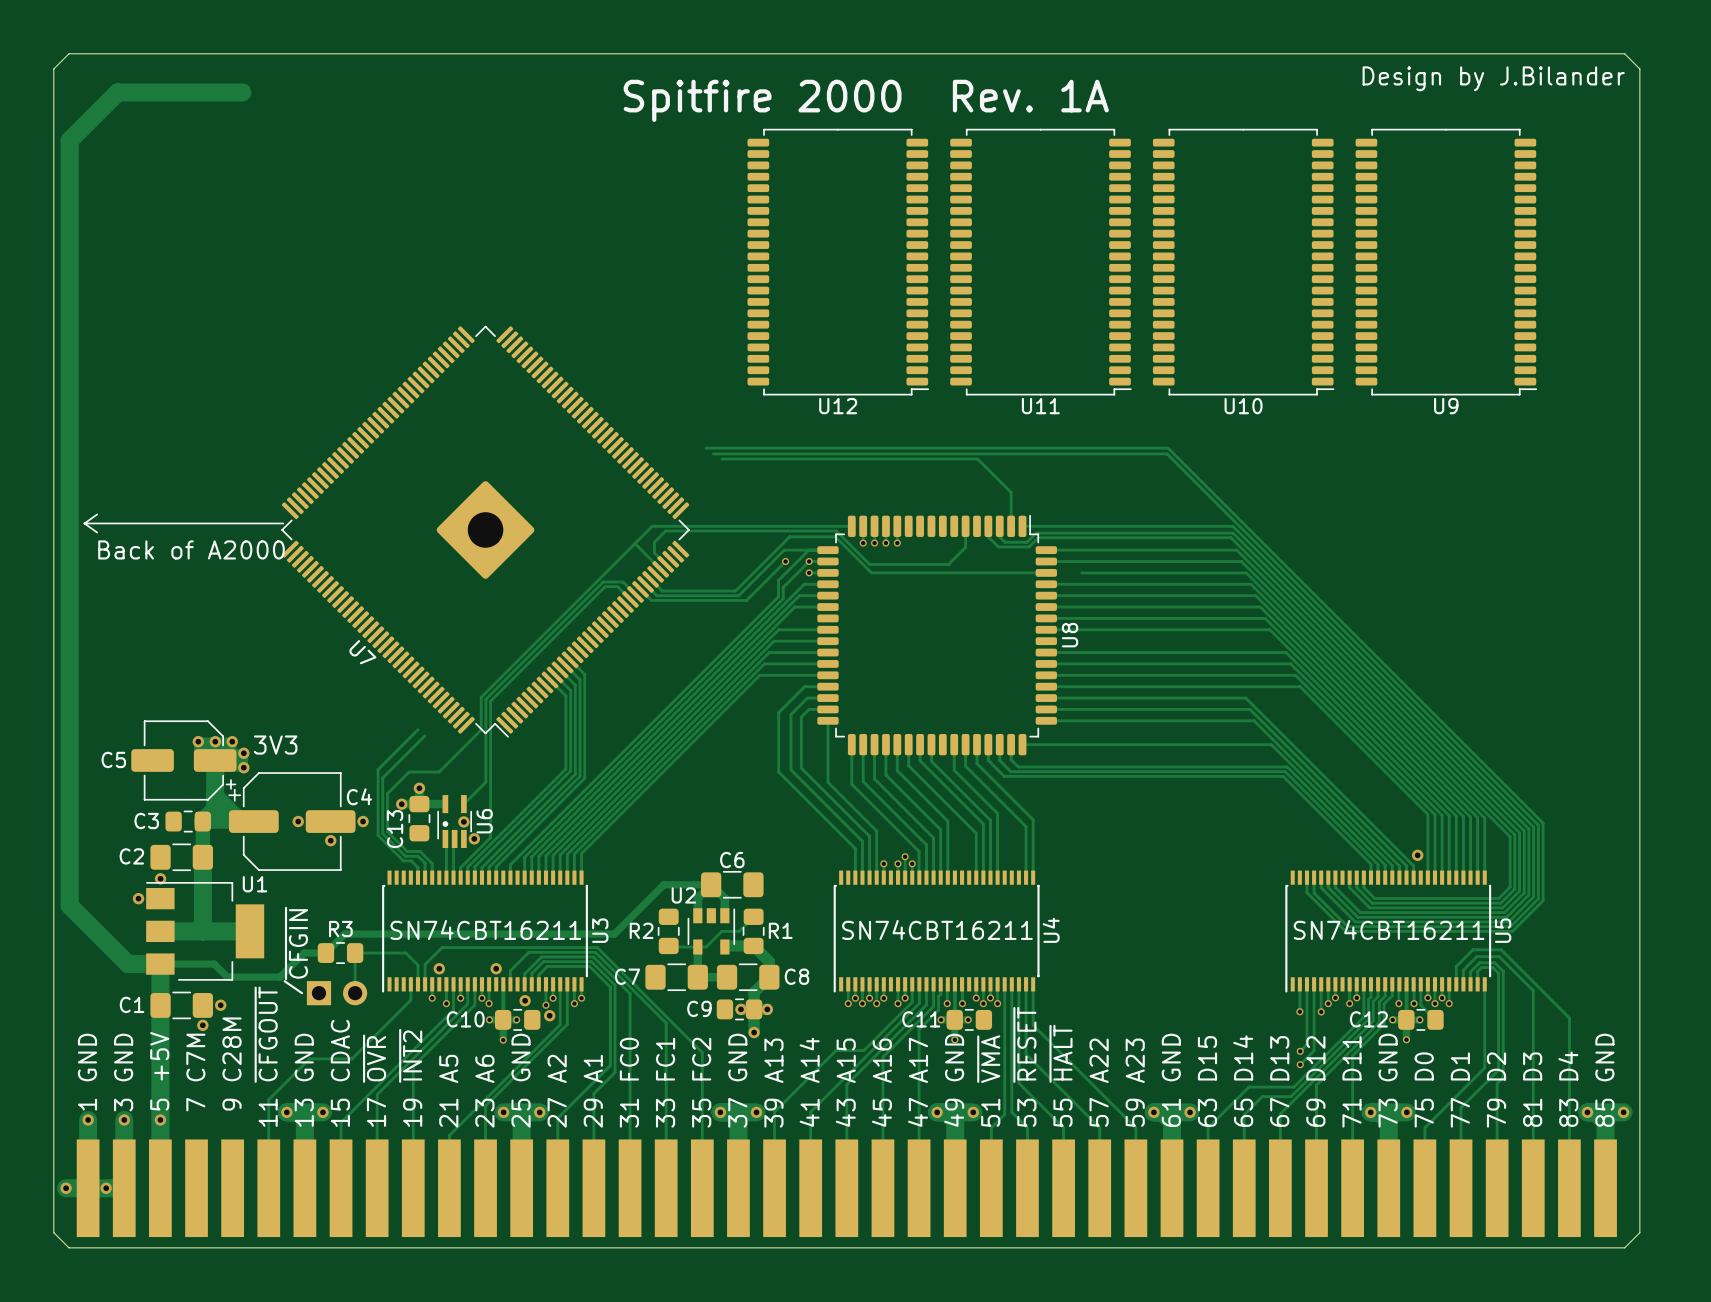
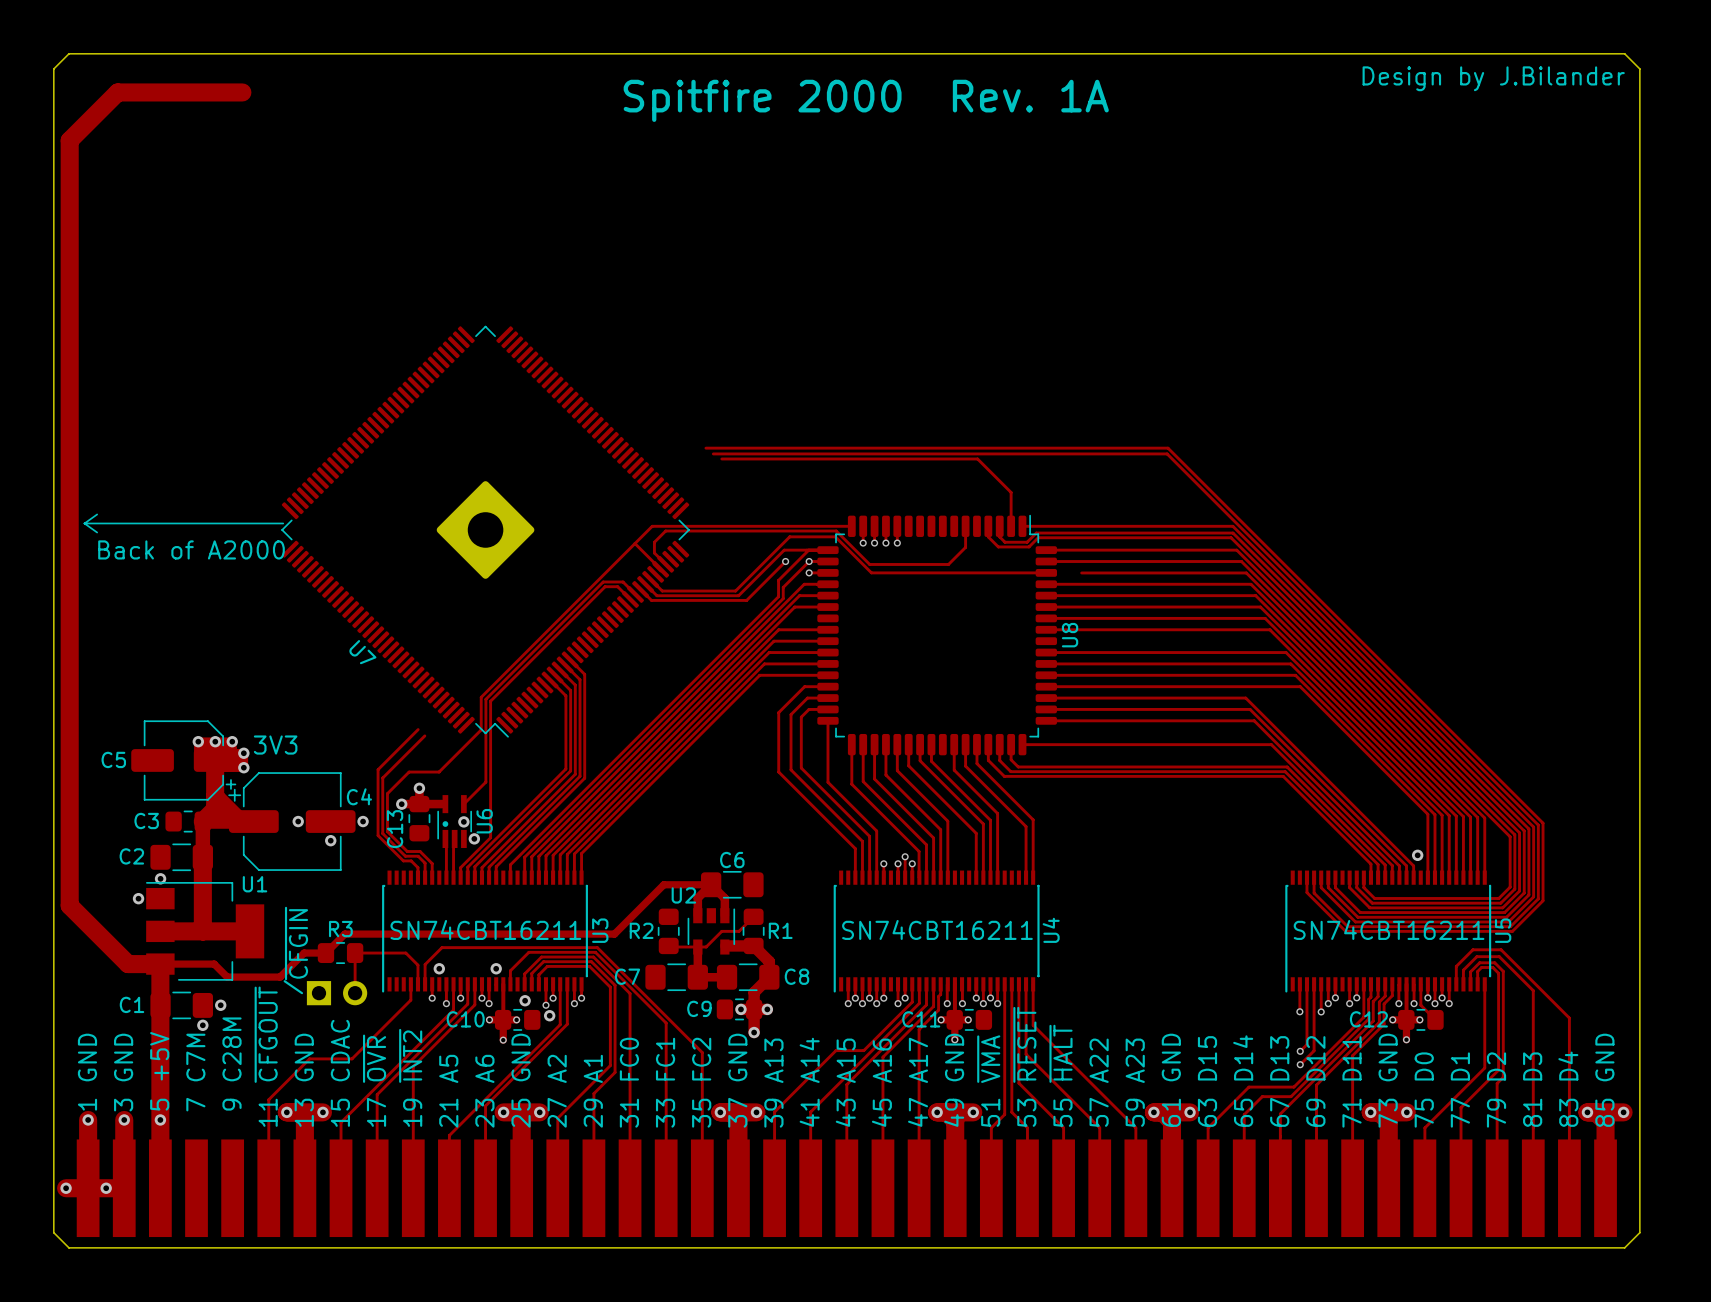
U12: (838, 262) -> none
U11: (1040, 262) -> none
U10: (1243, 262) -> none
U9: (1446, 262) -> none

